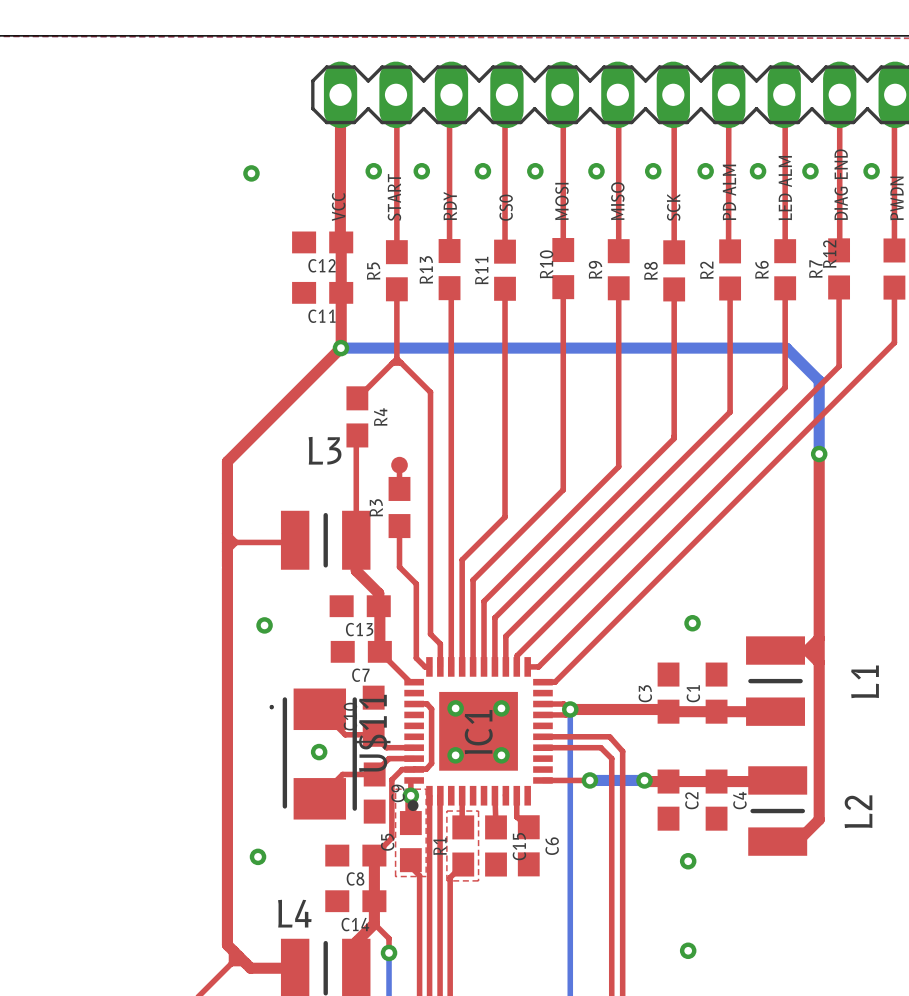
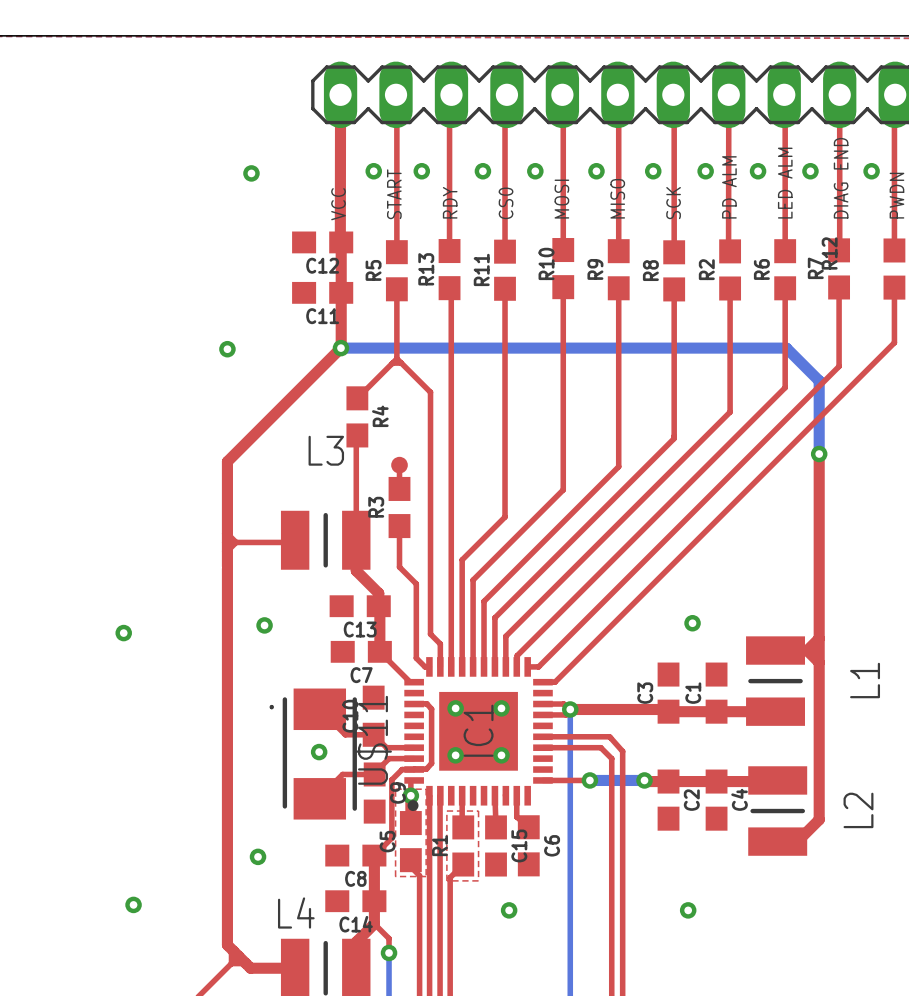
via: none -> (227, 349)
via: none -> (123, 633)
via: (688, 861) -> none
via: none -> (133, 904)
via: none -> (509, 910)
via: none -> (688, 910)
via: (688, 950) -> none

